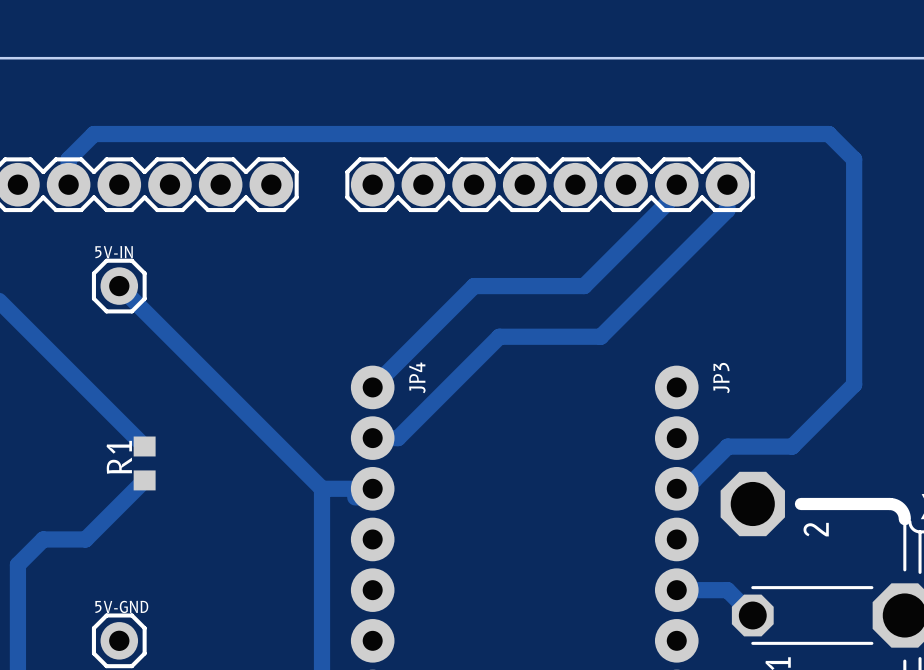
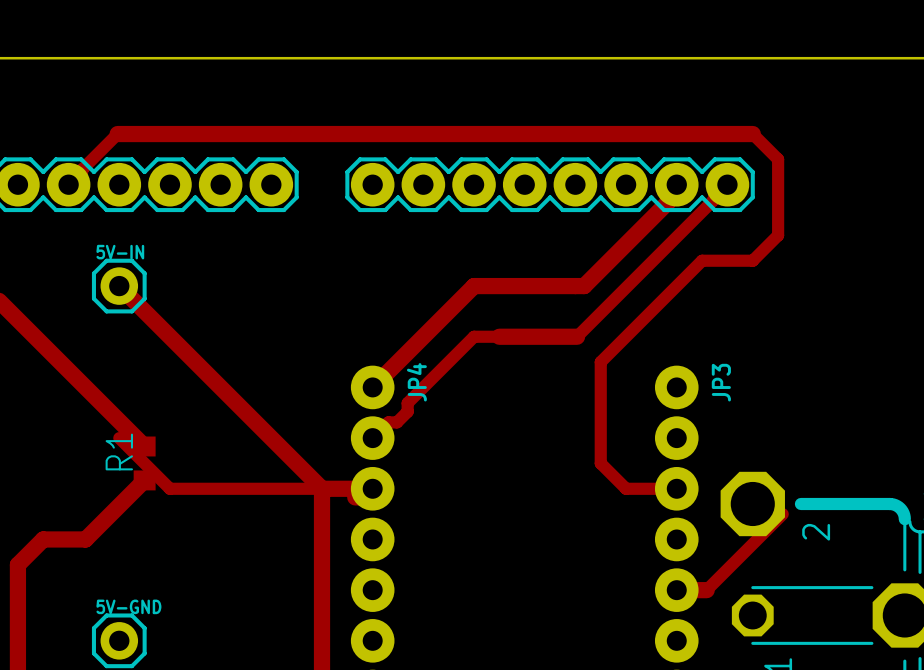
track: (117, 134) (93, 134) (68, 159) (68, 184) -> (117, 134) (68, 184)
track: (752, 134) (828, 134) (854, 159) (854, 384) (792, 446) (727, 446) (694, 480) (685, 480) (676, 488) -> (752, 134) (778, 159) (778, 235) (752, 260) (702, 260) (600, 362) (600, 463) (626, 488) (676, 488)
track: (727, 184) (727, 210) (600, 336) (577, 336) -> (727, 184) (577, 336)
track: (499, 336) (398, 438) (372, 438) -> (499, 336) (474, 336) (407, 403) (407, 411) (396, 422) (388, 422) (372, 438)
track: none -> (119, 438) (169, 488) (322, 488)
track: (706, 590) (727, 590) (752, 615) -> (706, 590) (782, 514)

